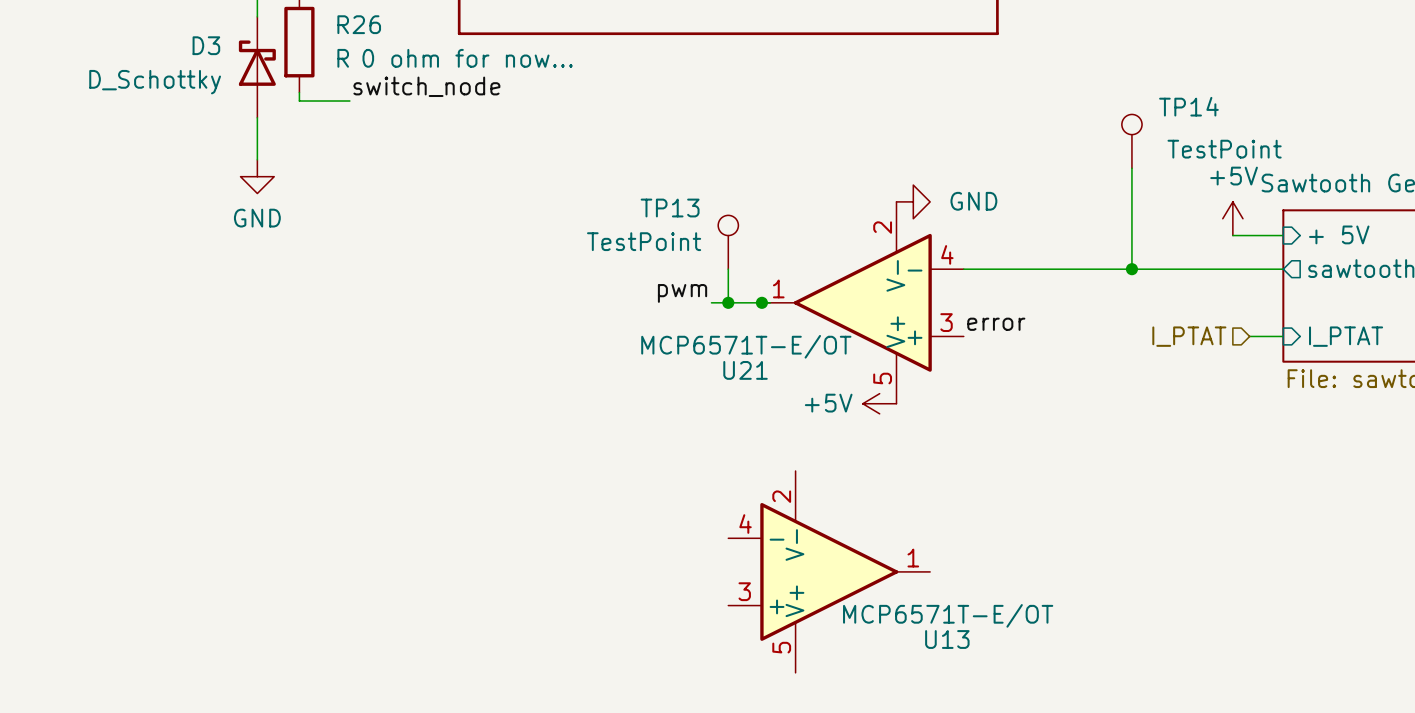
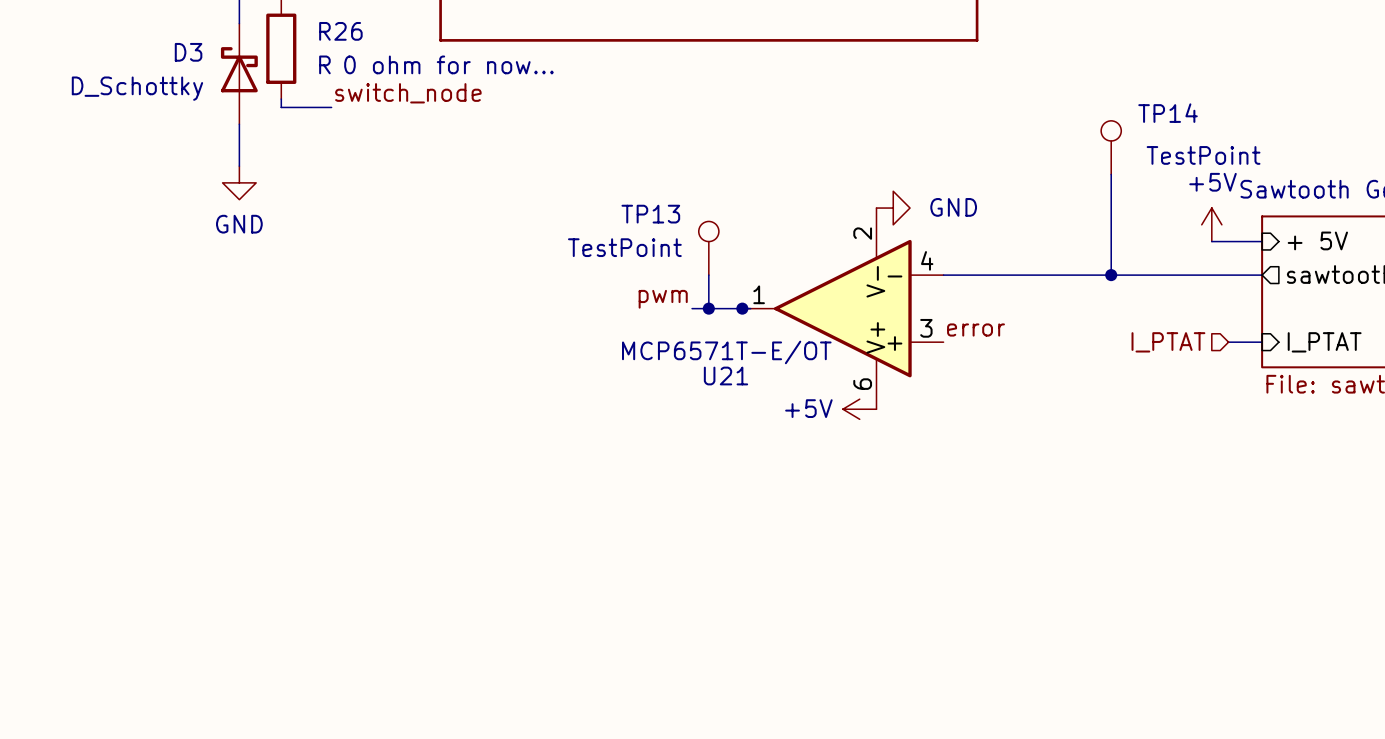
U21 pin number: 5 (882, 378) -> 6 (862, 384)
U13: MCP6571T-E/OT (829, 571) -> none

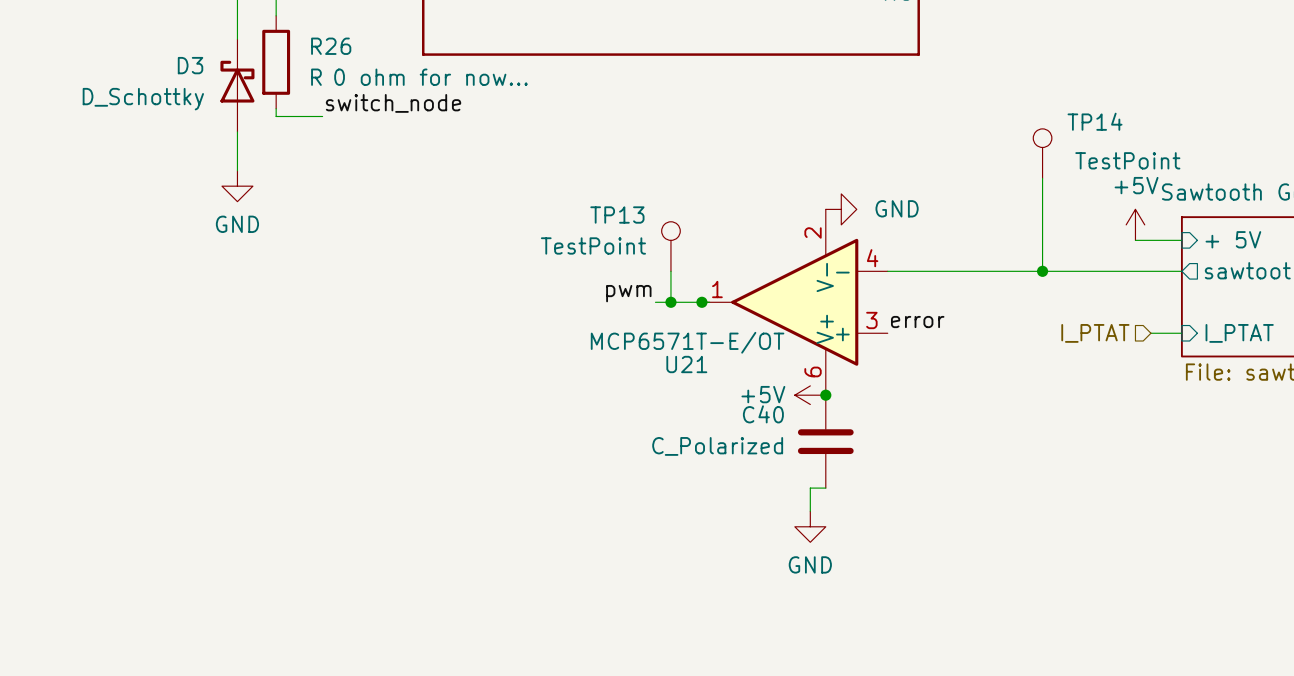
junction: none -> (825, 395)
C40: none -> C_Polarized (825, 441)
wire: none -> (825, 488) (810, 488) (810, 511)
power symbol: none -> GND (810, 526)

